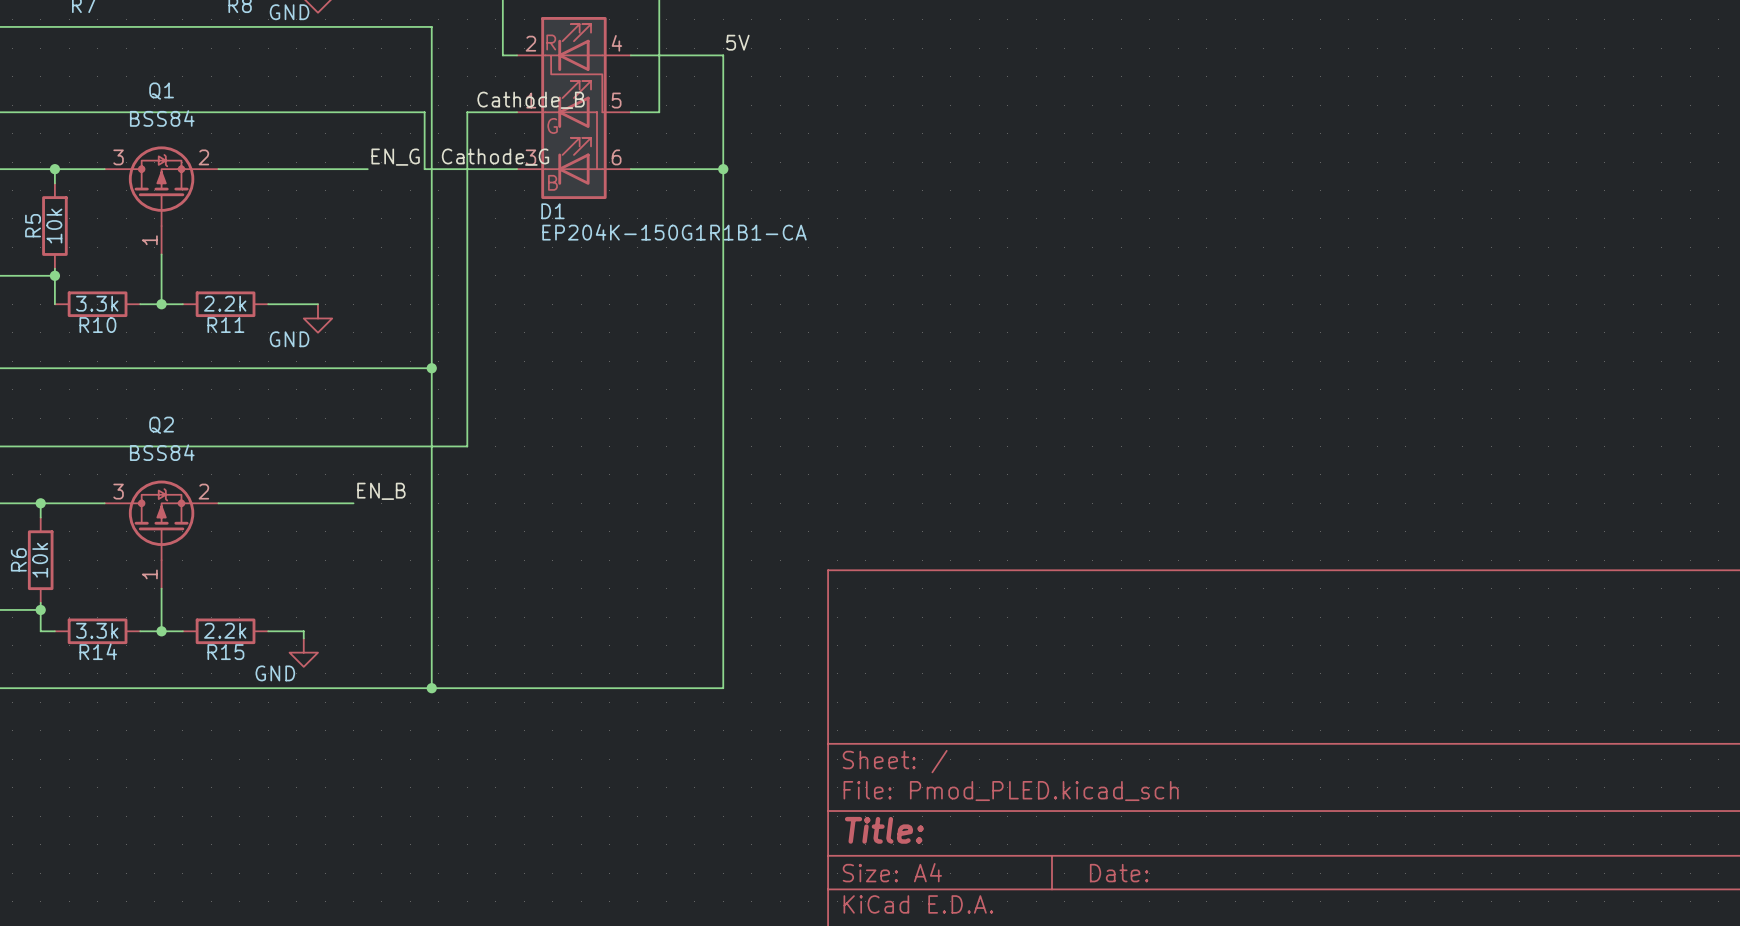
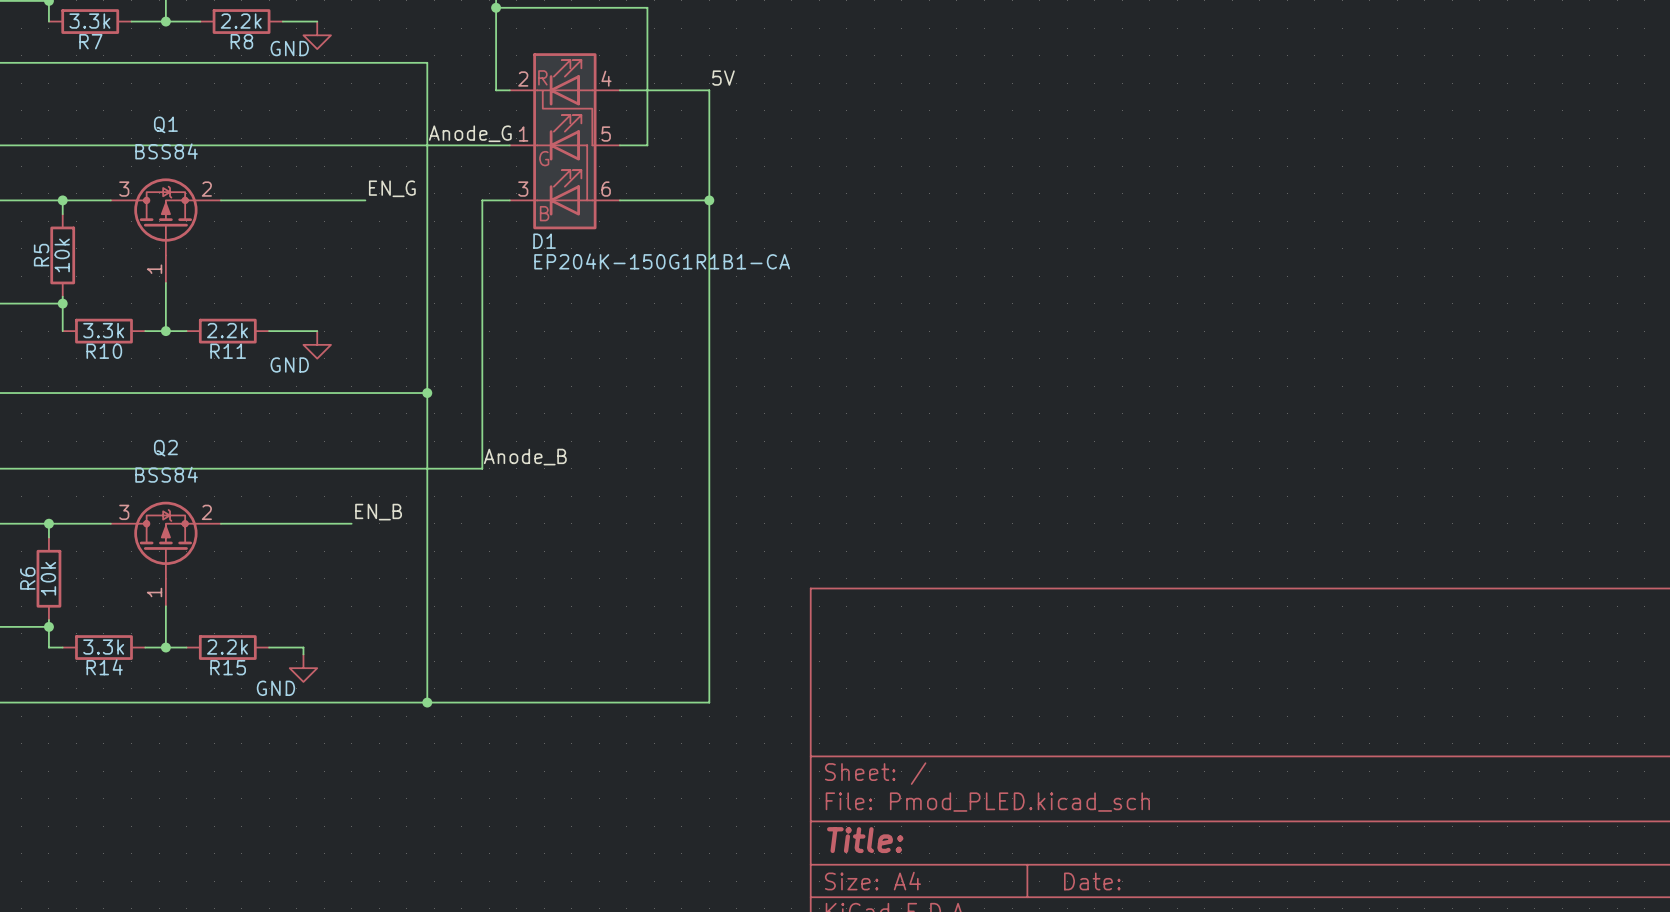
label: none -> Anode_G (470, 133)
label: Cathode_B (531, 100) -> none
wire: (424, 112) (424, 169) (488, 169) -> (420, 145) (461, 145)
wire: (467, 112) (467, 446) -> (482, 200) (482, 468) (461, 468)
label: Cathode_G (495, 157) -> none
label: none -> Anode_B (525, 457)

